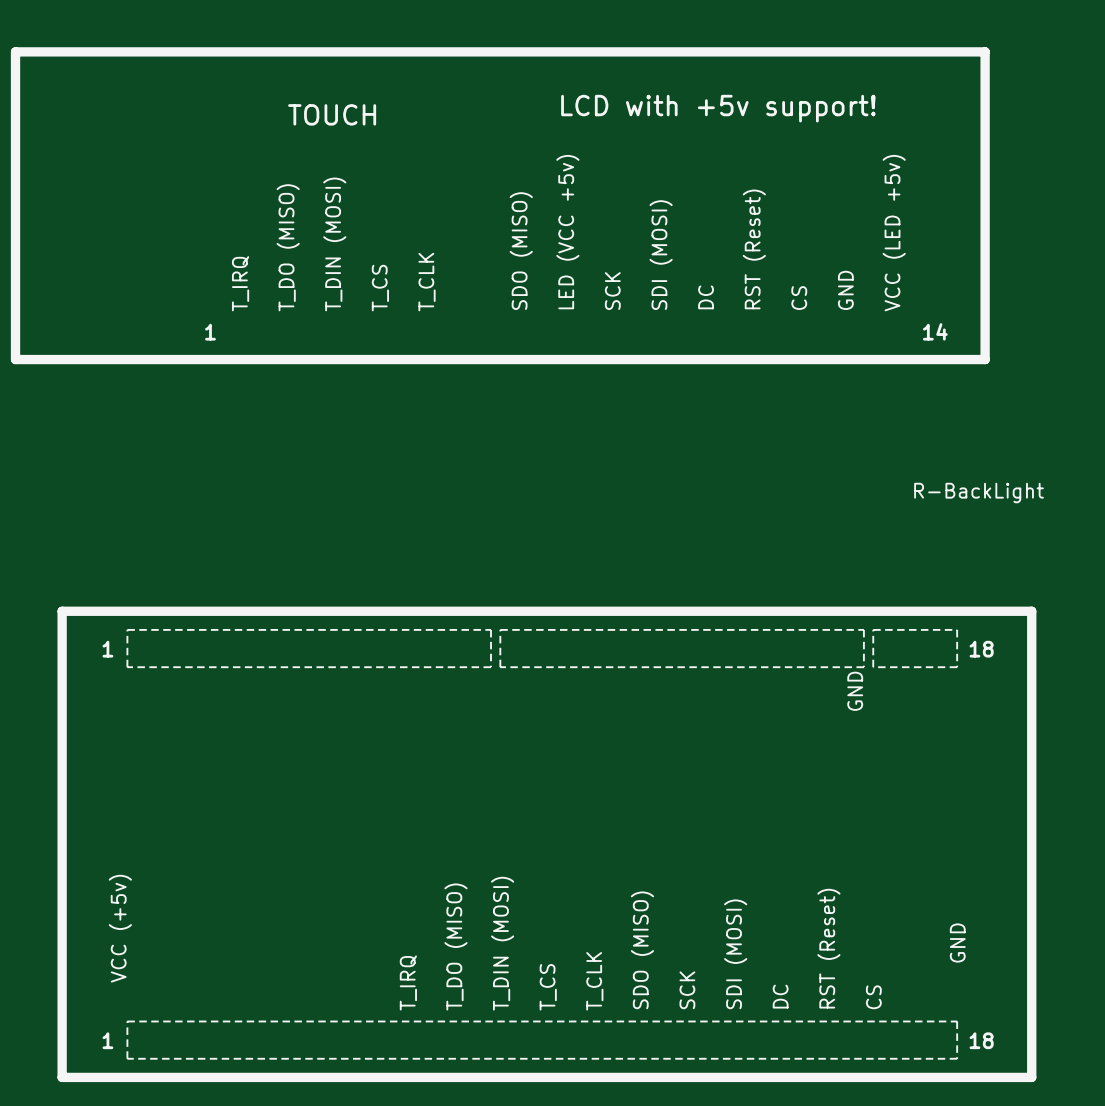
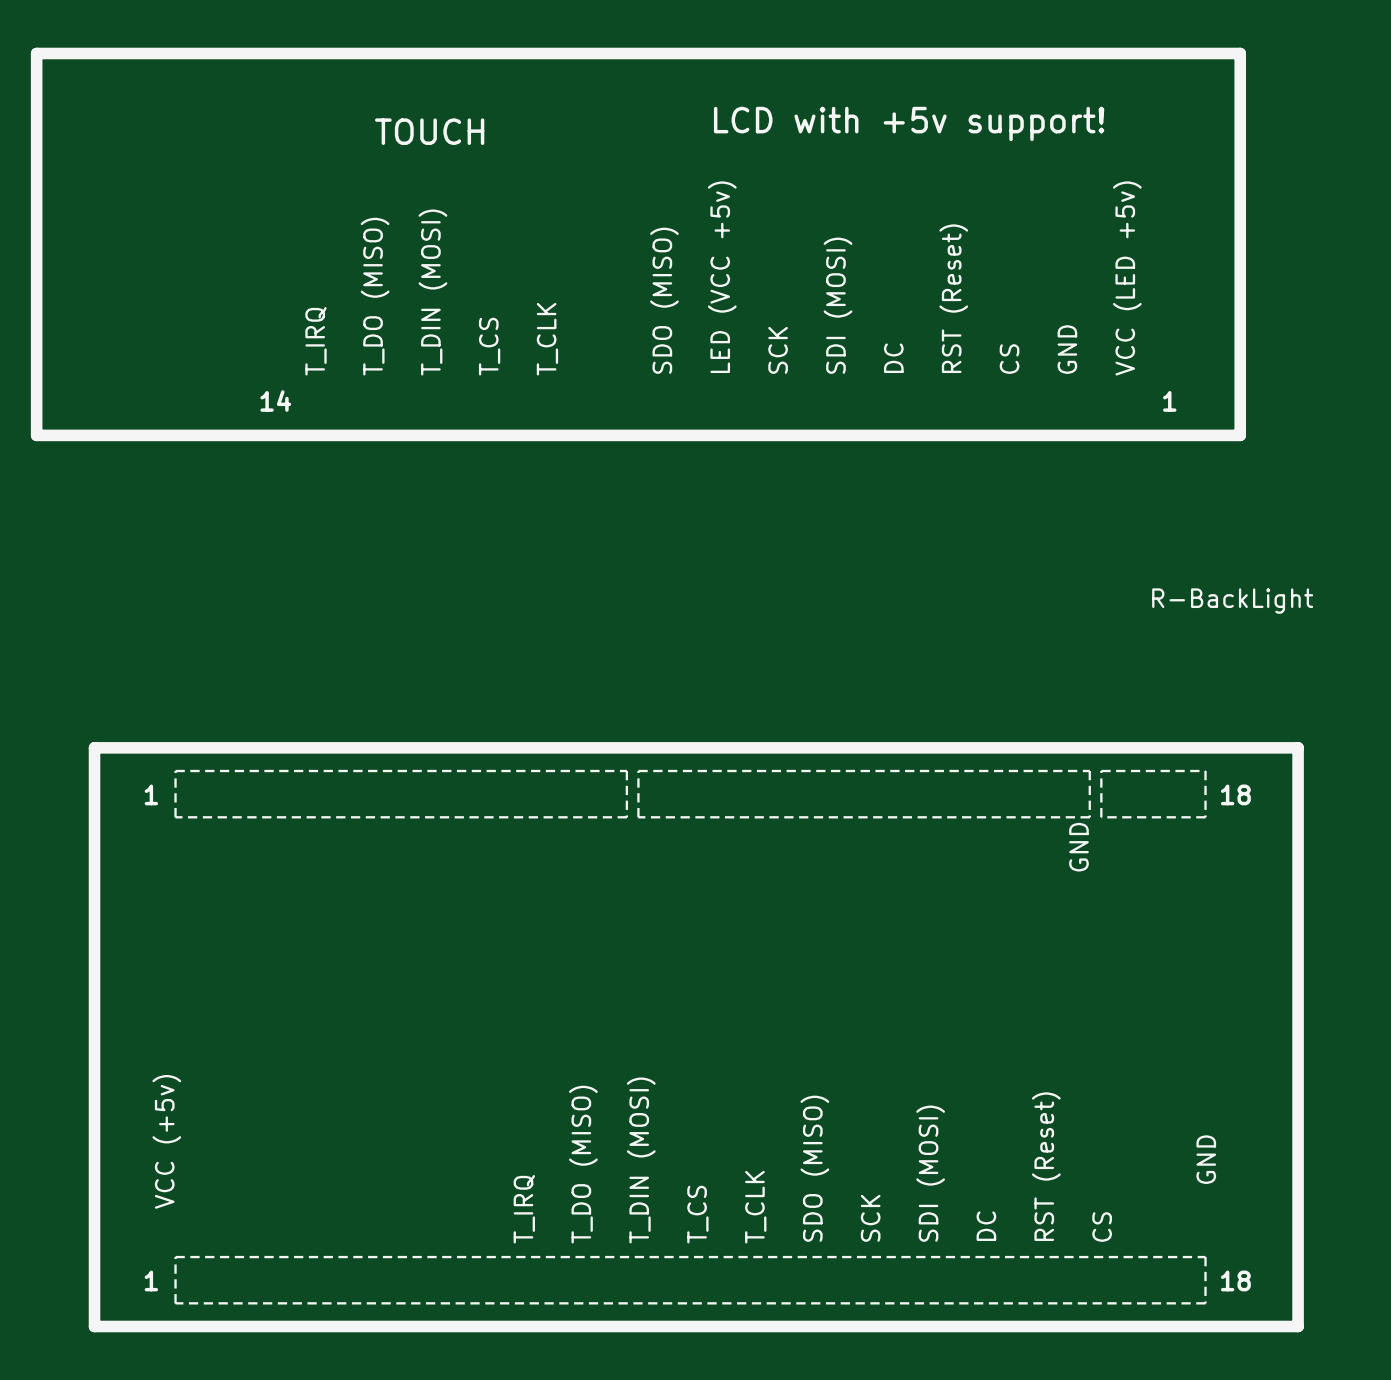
text: 14 (935, 331) -> 1 (1169, 401)
text: 1 (210, 332) -> 14 (275, 401)

